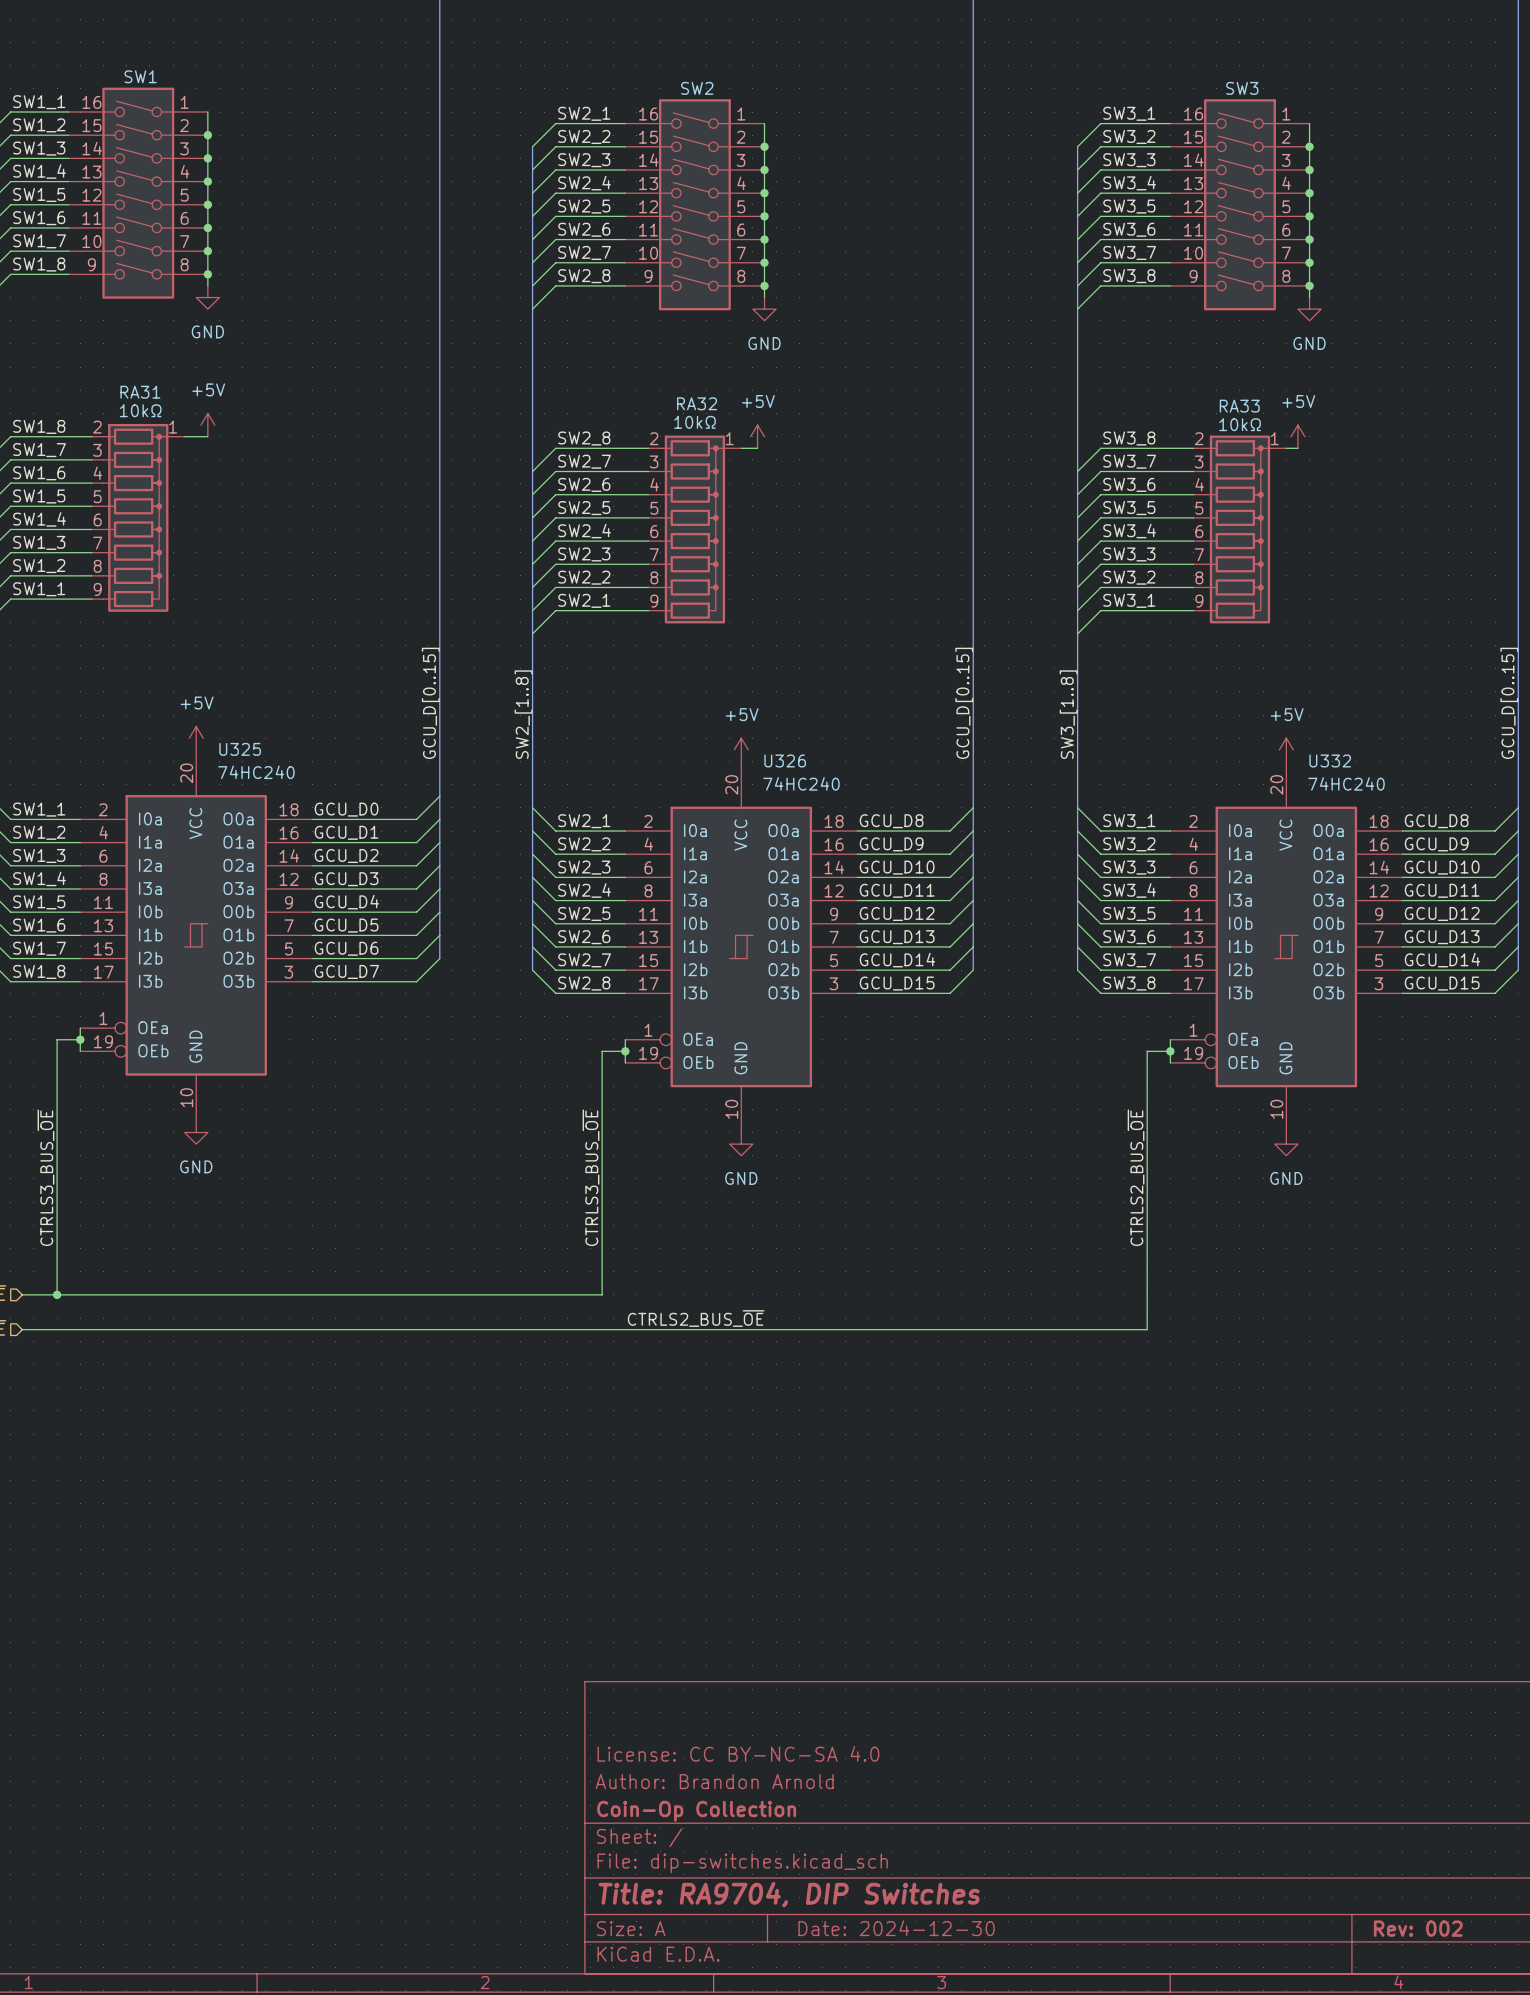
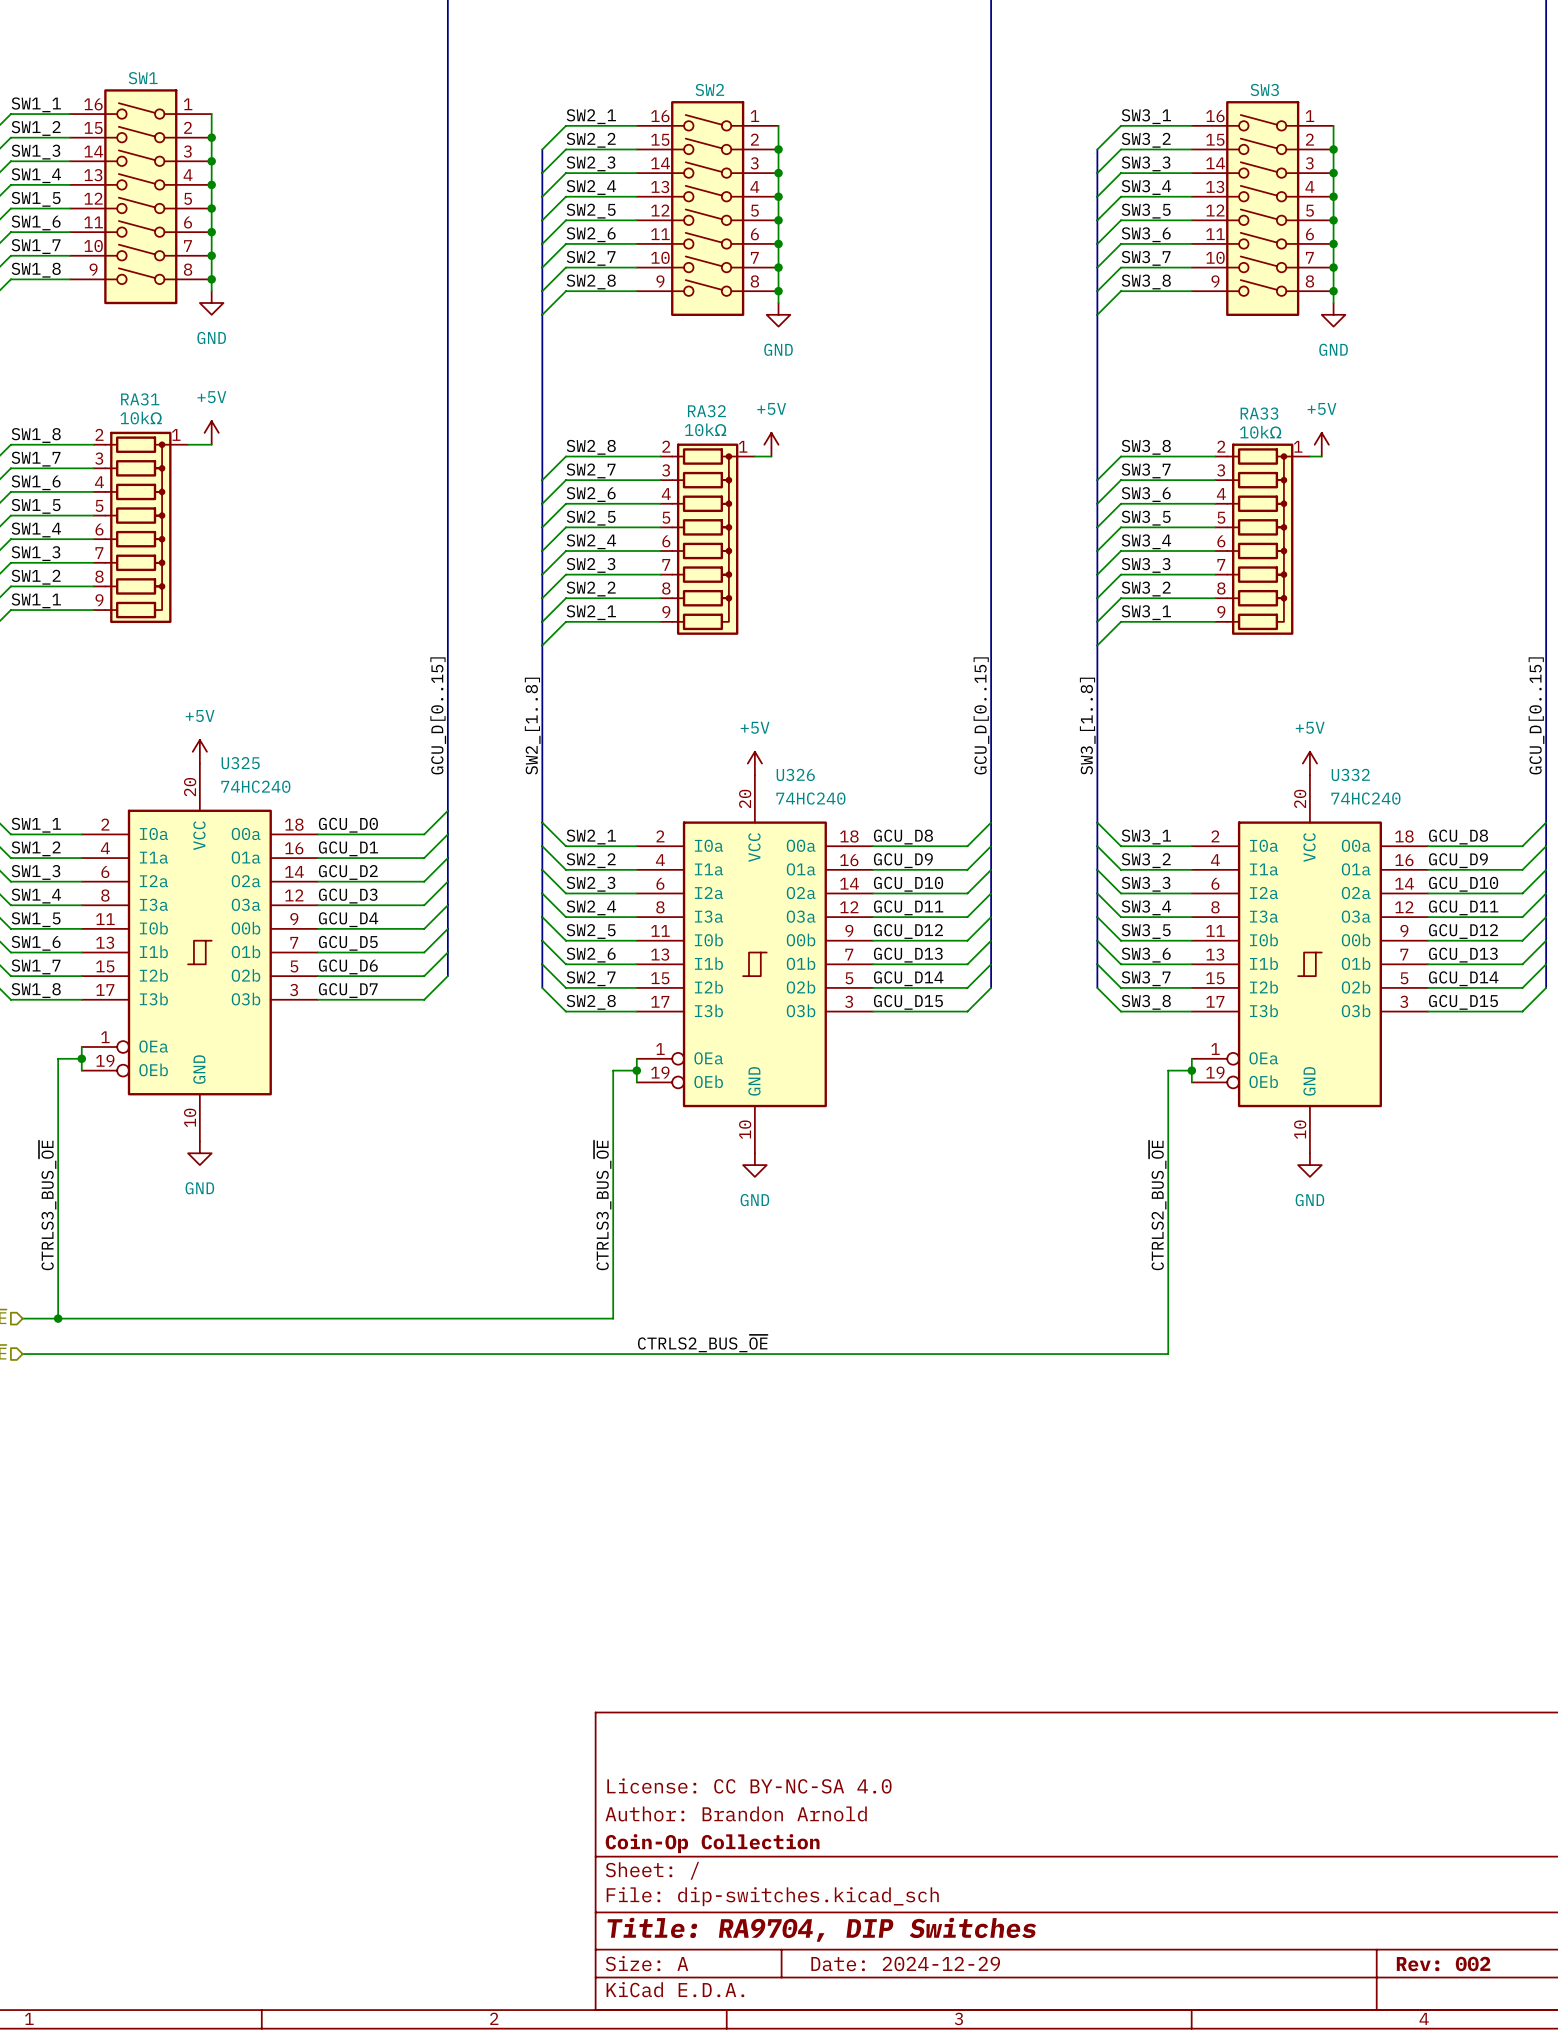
title block: Date: 2024-12-30 (896, 1928) -> Date: 2024-12-29 (905, 1963)

